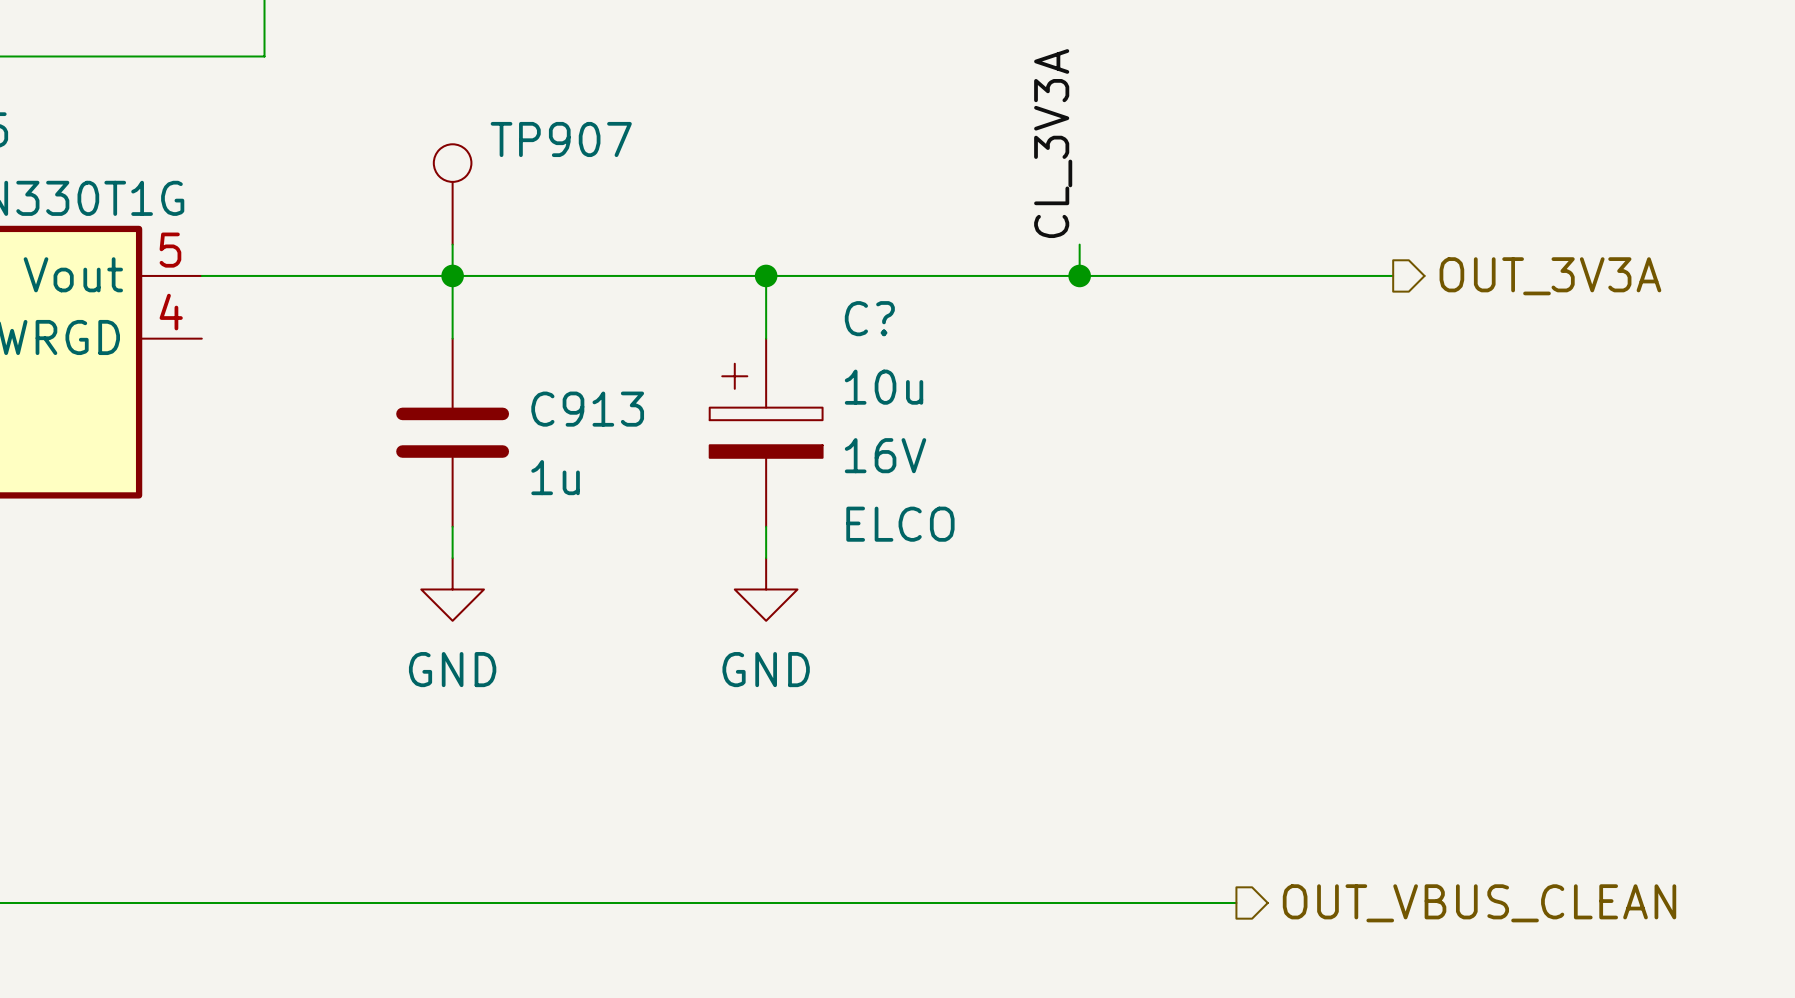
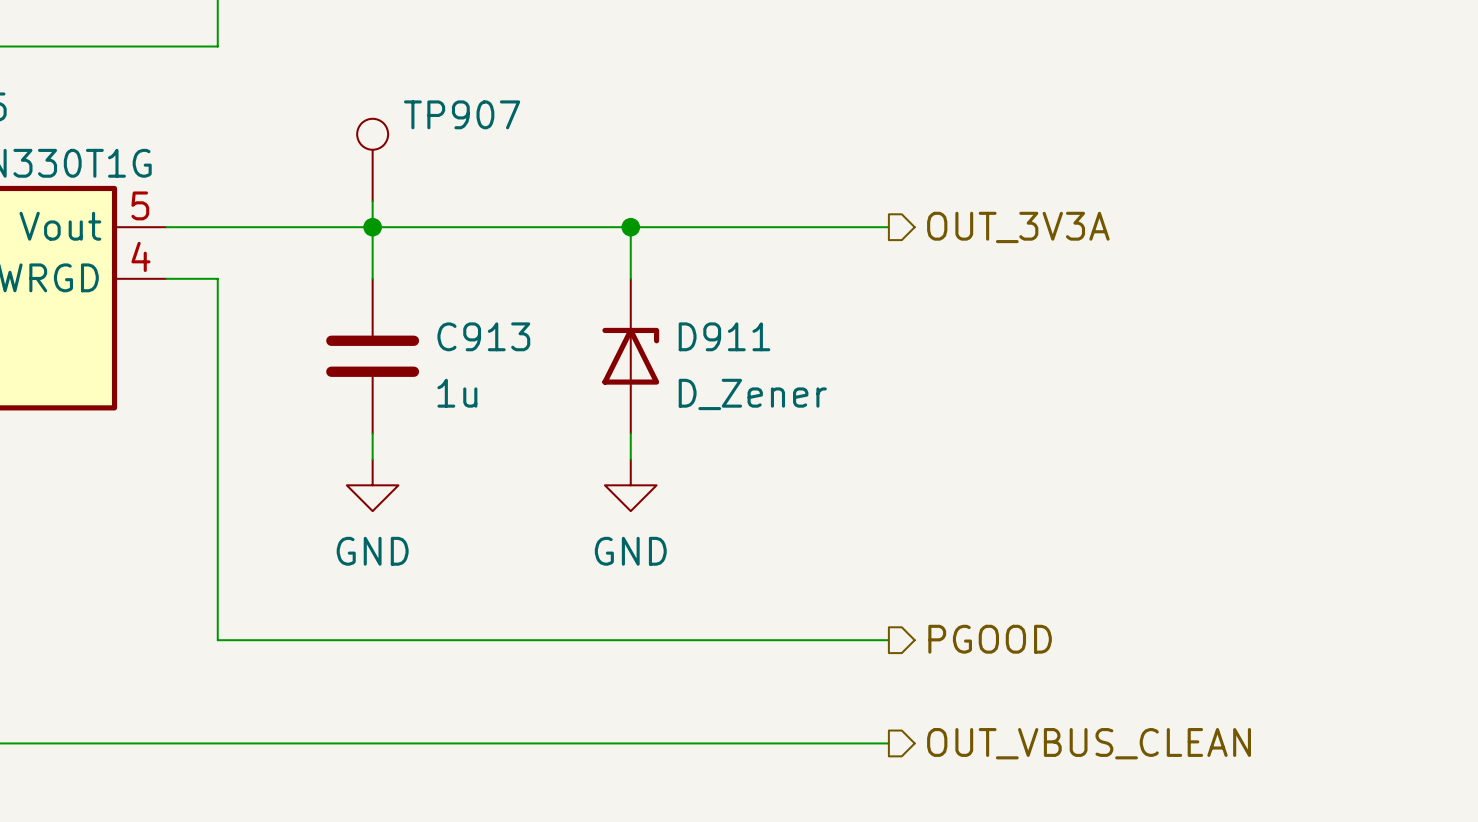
label: CL_3V3A (1053, 143) -> none
wire: (1079, 244) (1079, 275) (1393, 275) -> none
junction: (1079, 275) -> none
hierarchical label position: OUT_3V3A (1550, 276) -> OUT_3V3A (1018, 227)
wire: none -> (166, 278) (217, 278) (217, 640) (888, 640)
C?: 10u (766, 432) -> none
D911: none -> D_Zener (630, 356)
hierarchical label: none -> PGOOD (990, 639)
wire: (1079, 902) (1236, 902) -> none
hierarchical label position: OUT_VBUS_CLEAN (1479, 903) -> OUT_VBUS_CLEAN (1089, 743)

